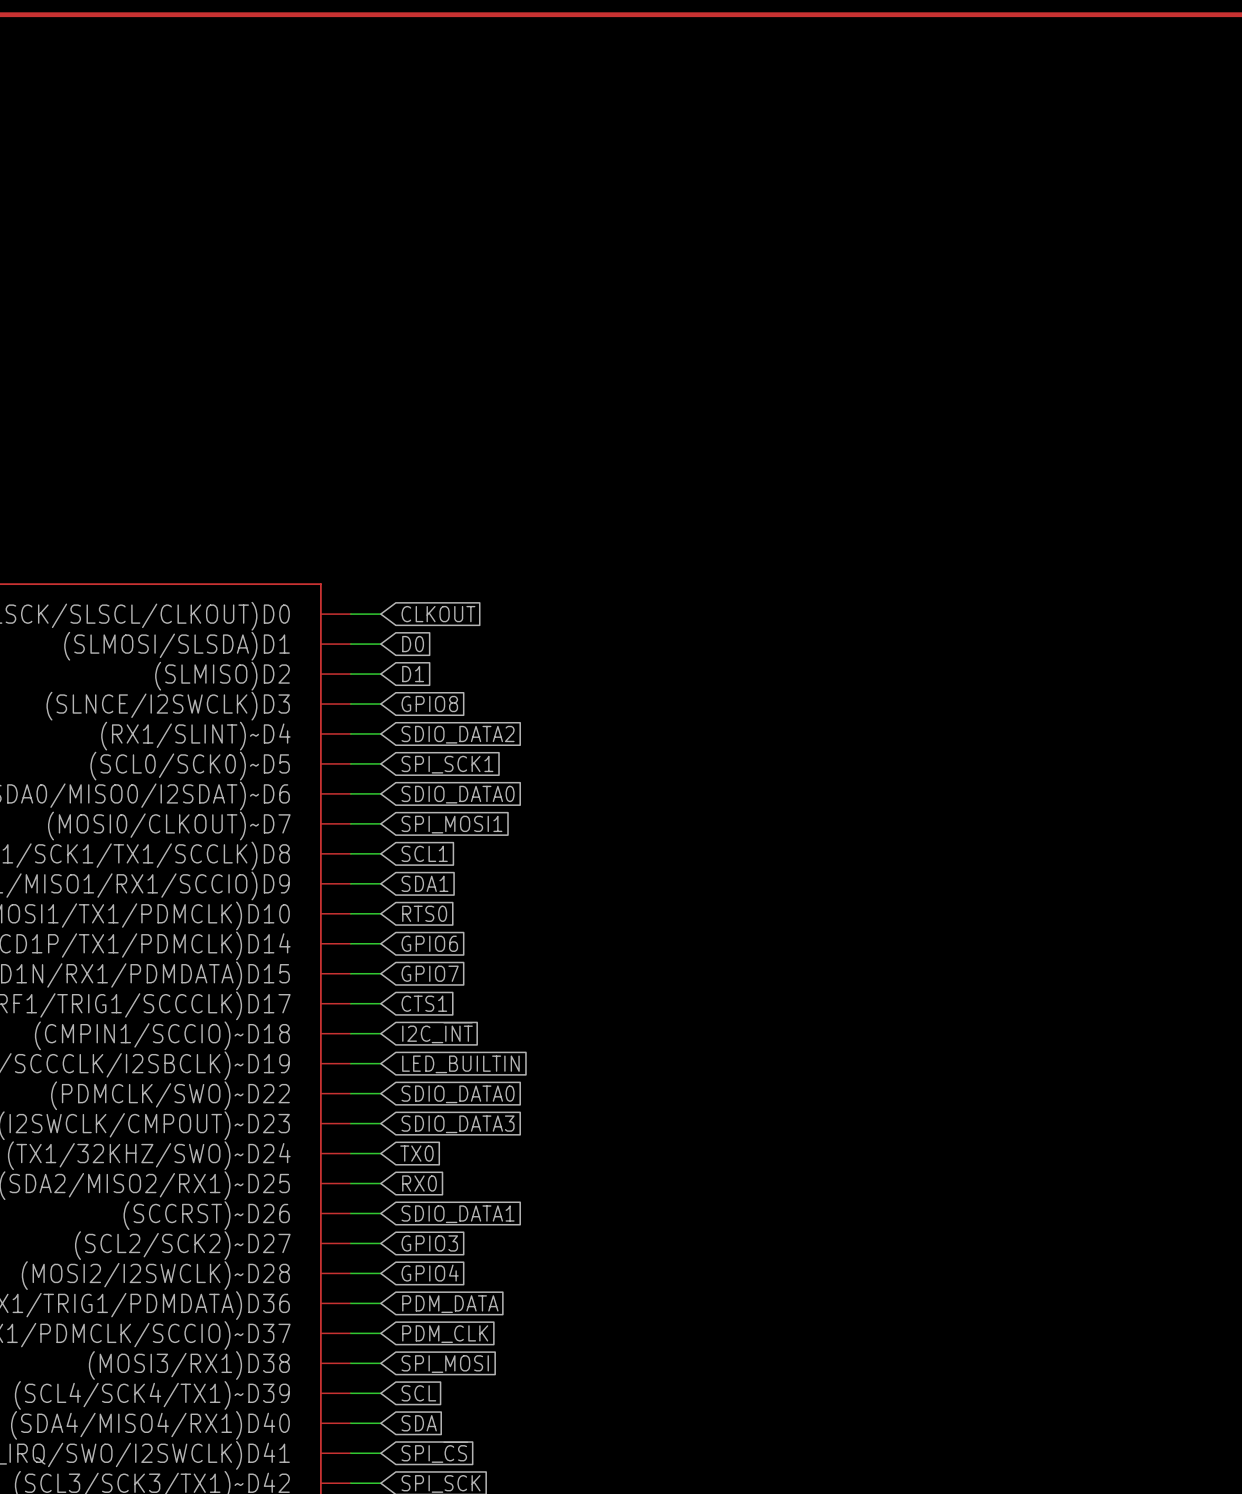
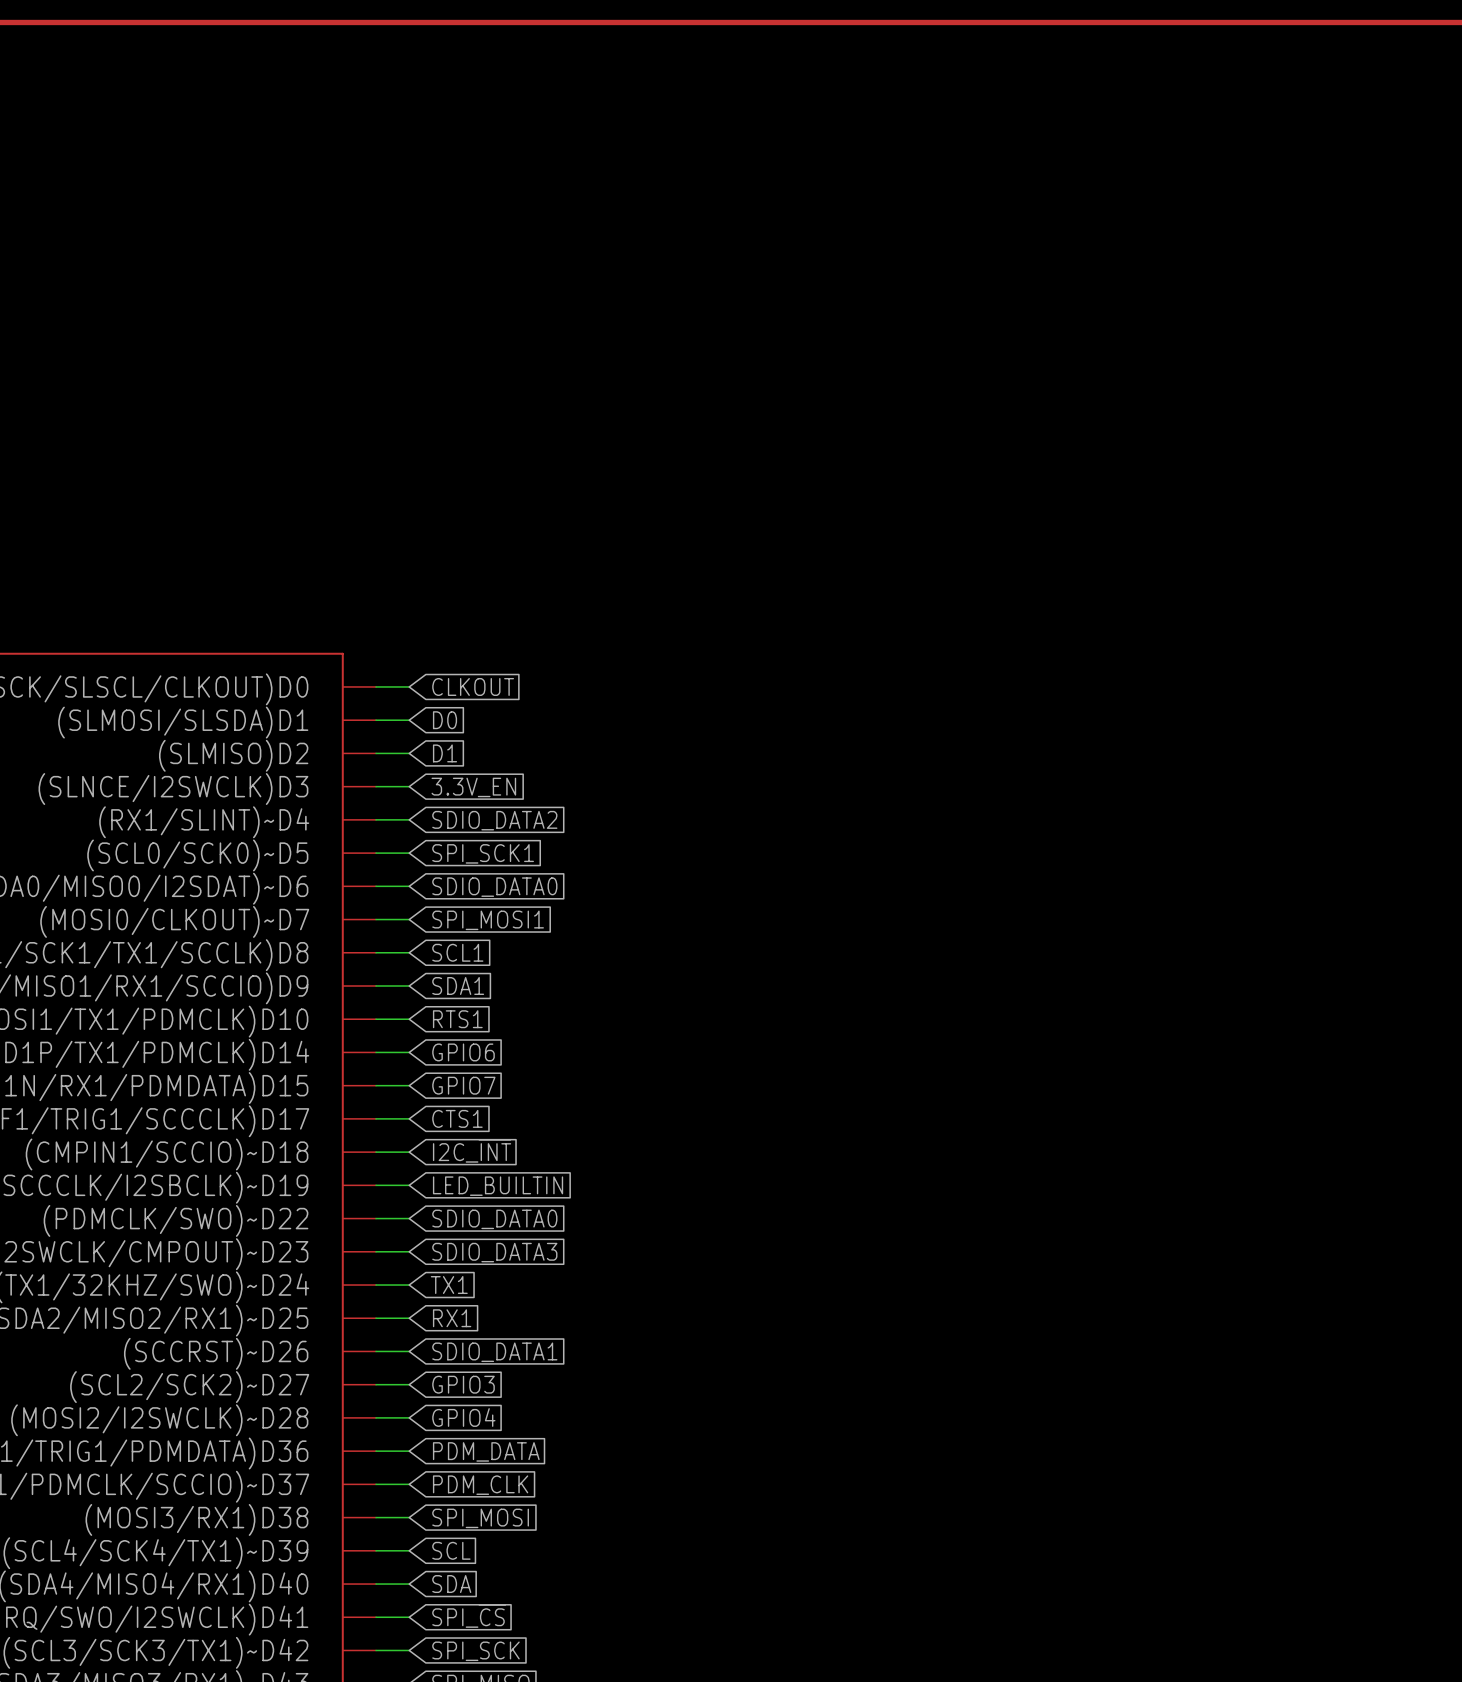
global label: GPIO8 (429, 704) -> 3.3V_EN (473, 787)
global label: RTS0 (424, 913) -> RTS1 (457, 1019)
global label: TX0 (416, 1153) -> TX1 (449, 1285)
global label: RX0 (419, 1183) -> RX1 (452, 1318)

